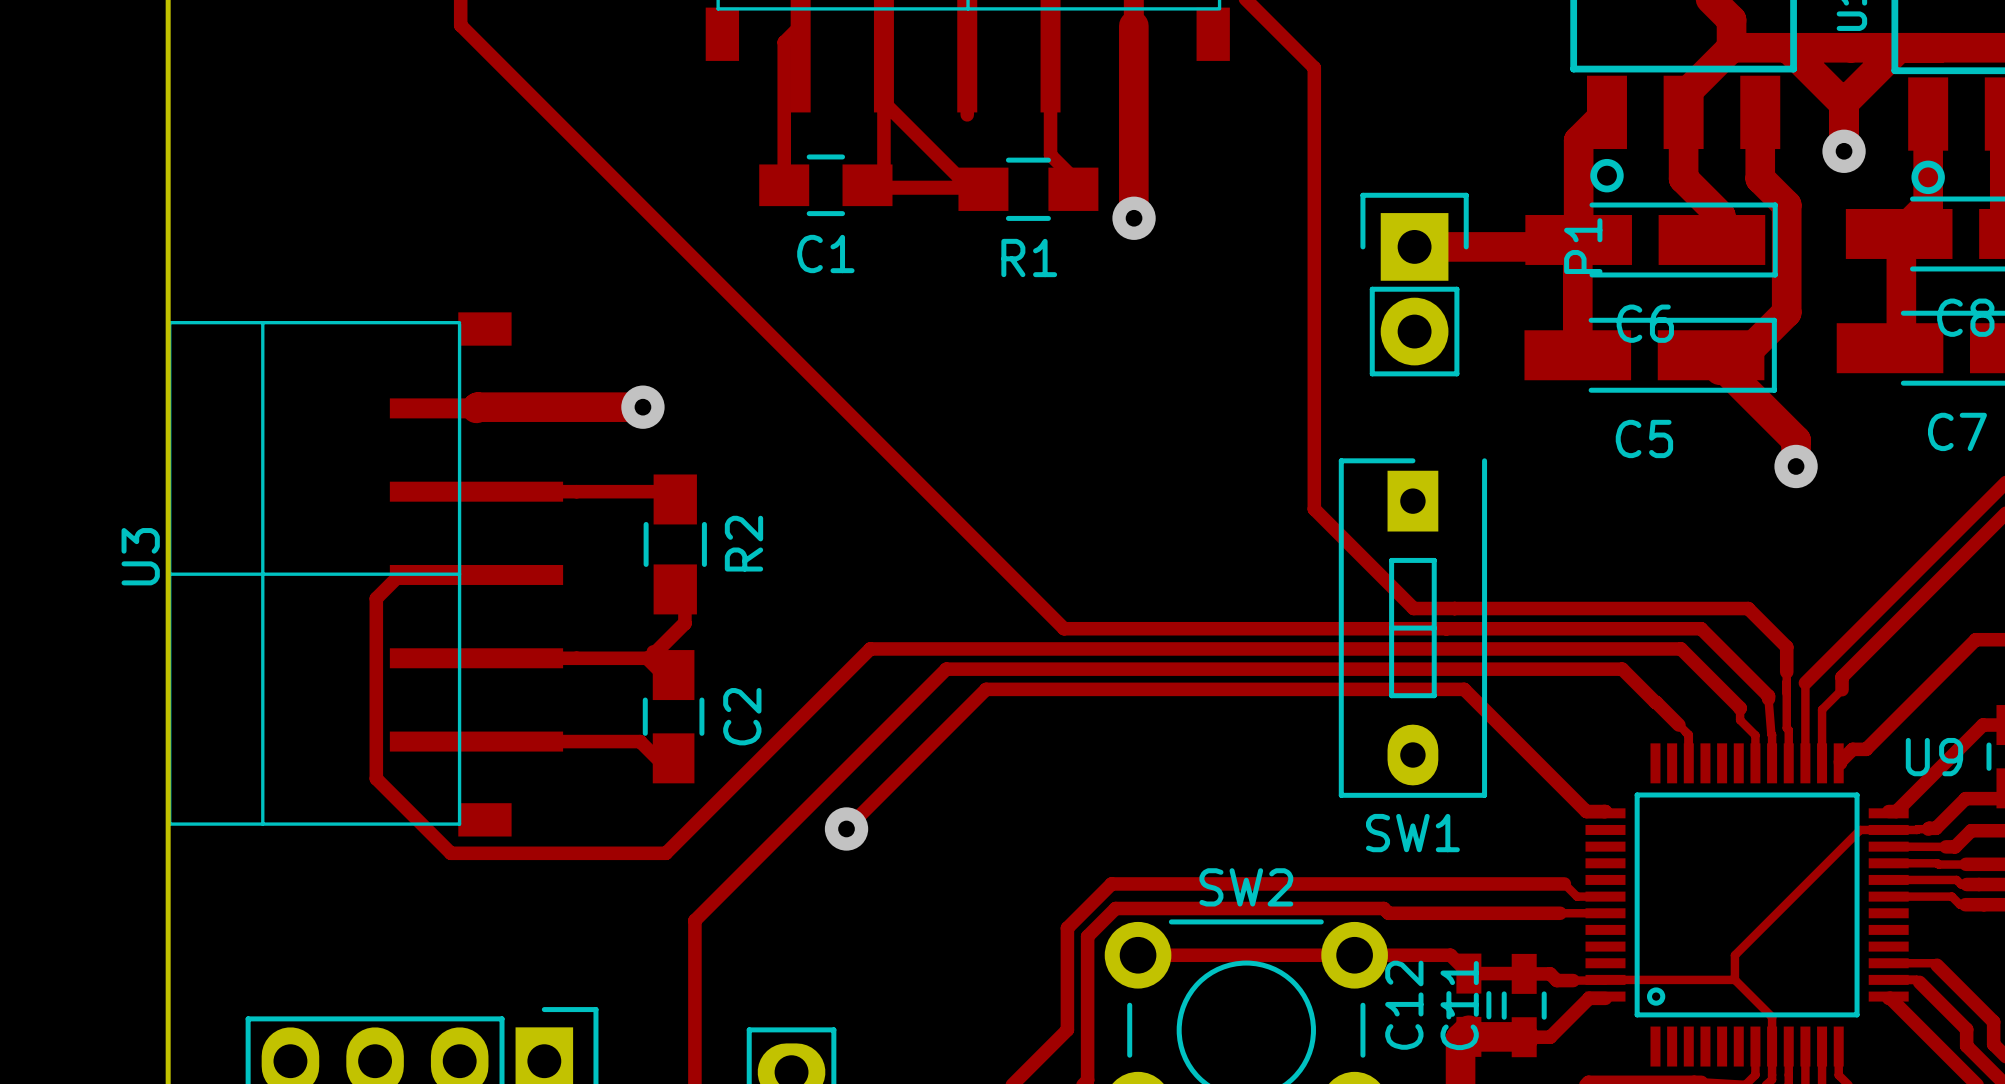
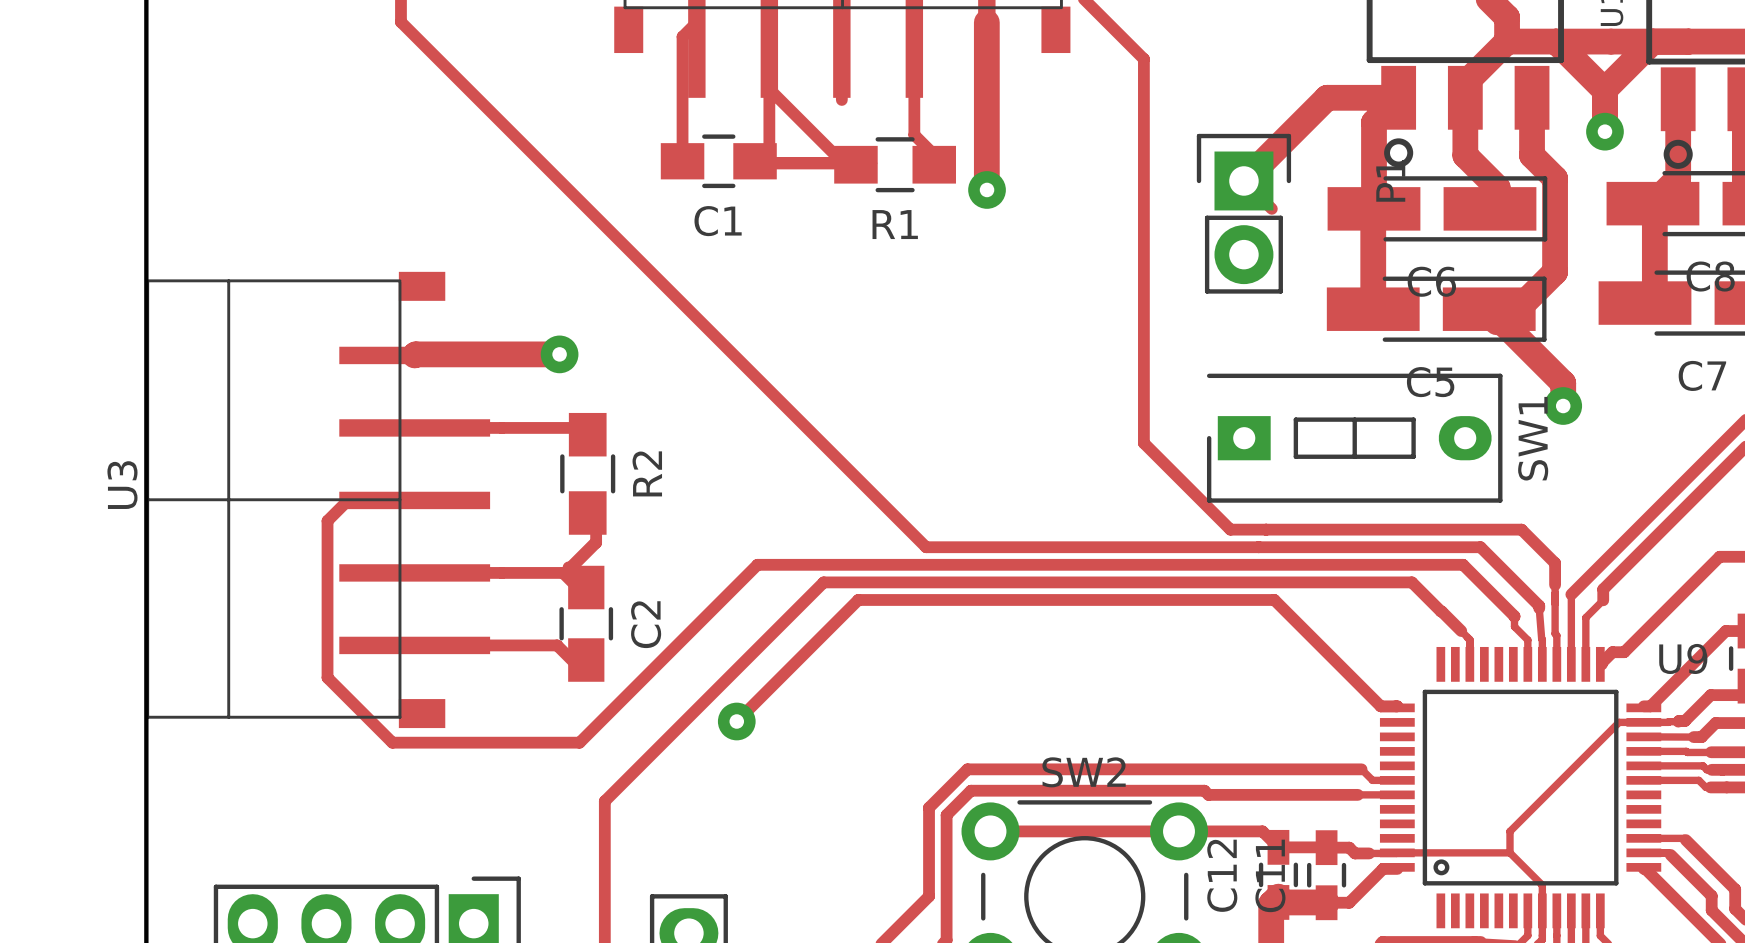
track: none -> (1398, 97) (1327, 97) (1243, 180) (1271, 208)
track: (1577, 240) (1571, 246) (1414, 246) -> none
P1 position: (1414, 284) -> (1243, 213)
SW1 rotation: 0° (1412, 628) -> 90° counterclockwise (1354, 438)

